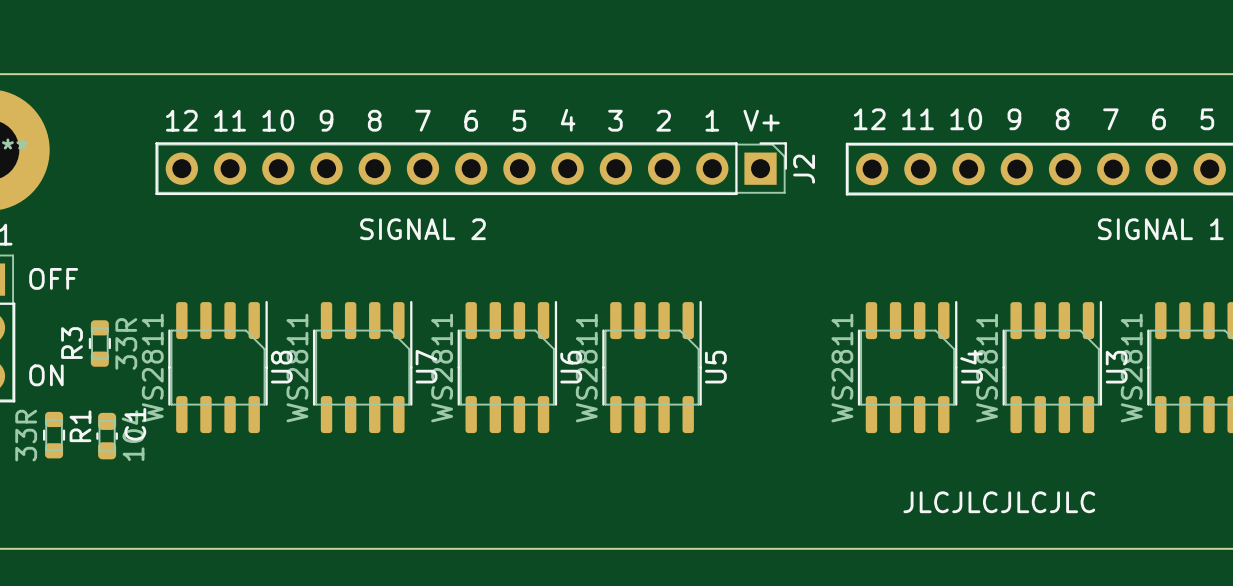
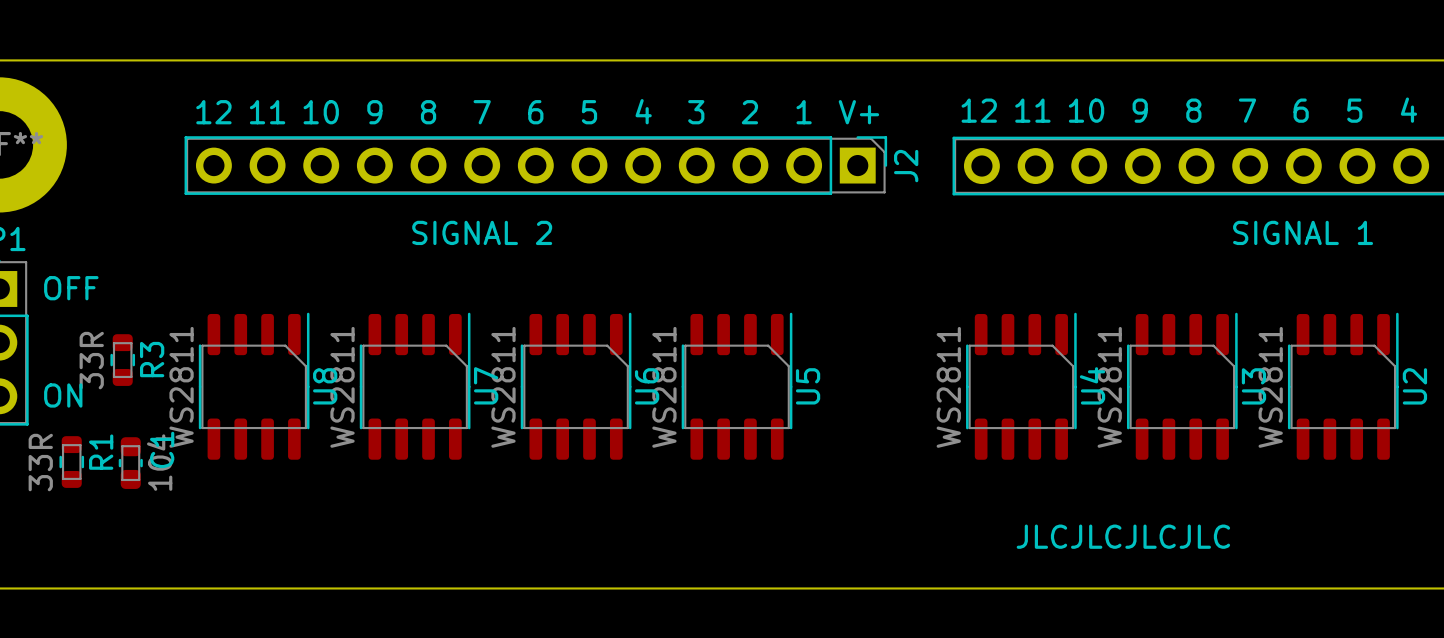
R3 name position: R3 (72, 343) -> R3 (152, 359)
R3 value position: 33R (126, 343) -> 33R (91, 360)

